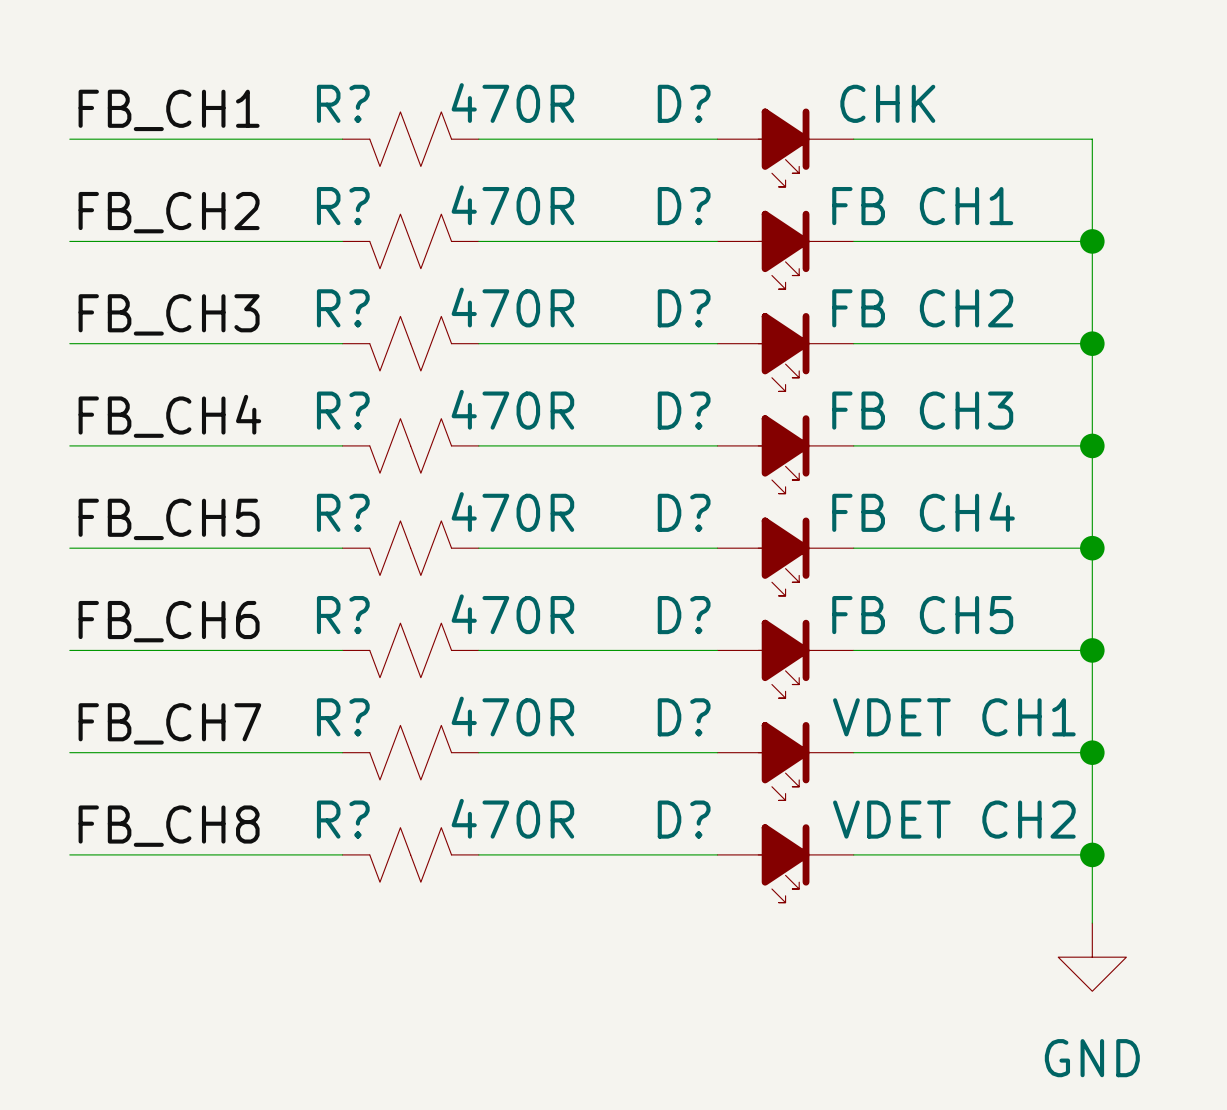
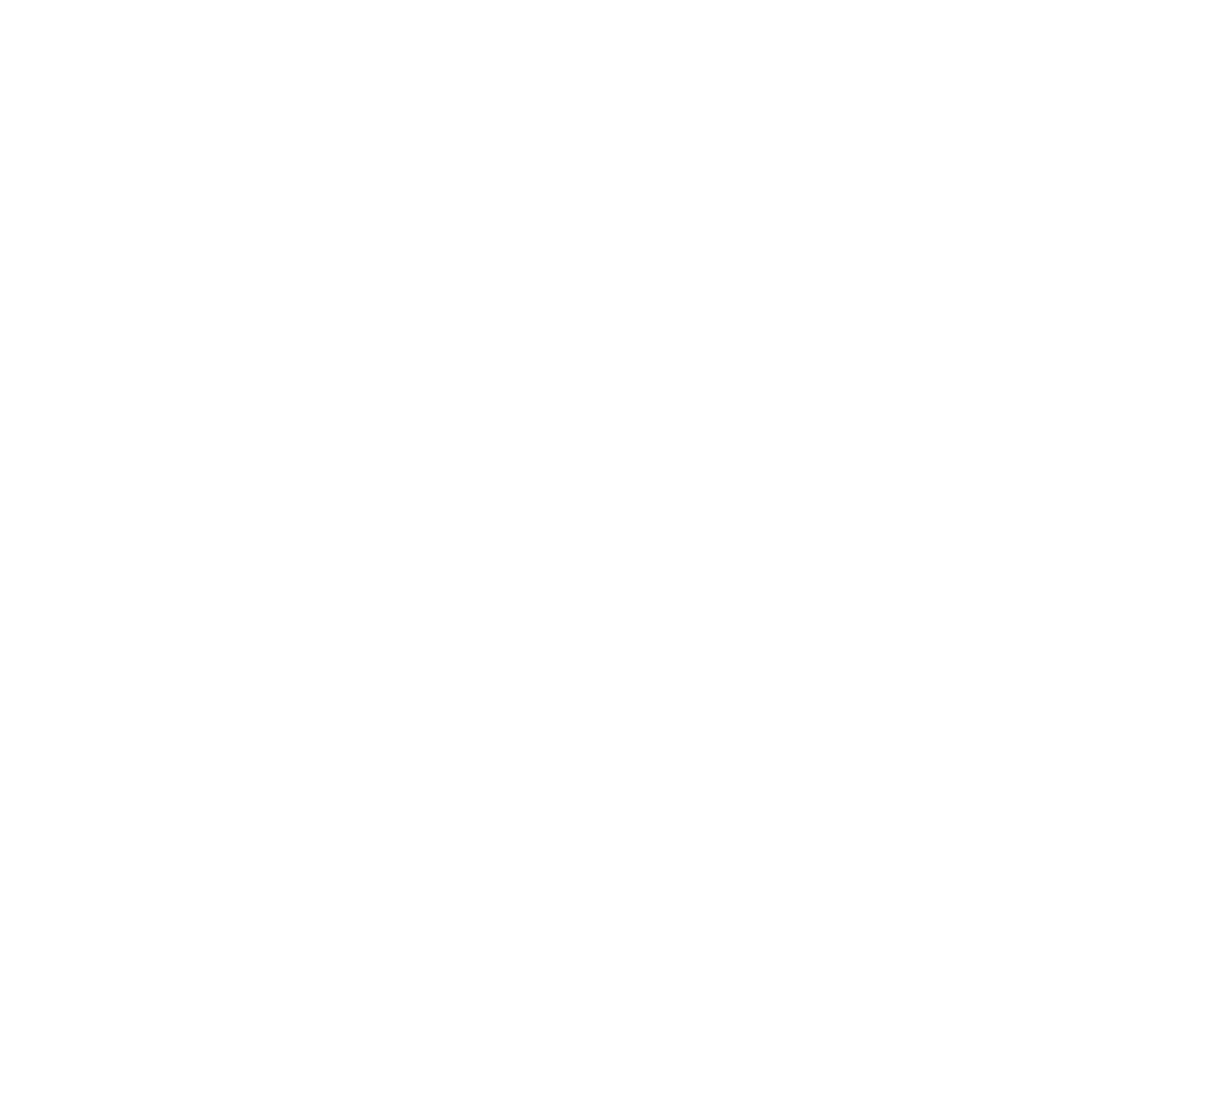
label: FB_CH1 (169, 110) -> none
wire: (69, 139) (342, 139) -> none
R?: 470R (410, 139) -> none
wire: (478, 139) (717, 139) -> none
wire: (853, 139) (1092, 139) (1092, 923) -> none
D?: CHK (785, 147) -> none
label: FB_CH2 (169, 212) -> none
wire: (69, 241) (342, 241) -> none
R?: 470R (410, 241) -> none
wire: (478, 241) (717, 241) -> none
wire: (853, 241) (1092, 241) -> none
junction: (1092, 241) -> none
D?: FB CH1 (785, 249) -> none
label: FB_CH3 (169, 314) -> none
wire: (69, 343) (342, 343) -> none
R?: 470R (410, 343) -> none
wire: (478, 343) (717, 343) -> none
wire: (853, 343) (1092, 343) -> none
junction: (1092, 343) -> none
D?: FB CH2 (785, 352) -> none
label: FB_CH4 (169, 416) -> none
wire: (69, 445) (342, 445) -> none
R?: 470R (410, 445) -> none
wire: (478, 445) (717, 445) -> none
wire: (853, 445) (1092, 445) -> none
junction: (1092, 445) -> none
D?: FB CH3 (785, 454) -> none
label: FB_CH5 (169, 519) -> none
wire: (69, 548) (342, 548) -> none
R?: 470R (410, 548) -> none
wire: (478, 548) (717, 548) -> none
wire: (853, 548) (1092, 548) -> none
junction: (1092, 548) -> none
D?: FB CH4 (785, 556) -> none
label: FB_CH6 (169, 621) -> none
wire: (69, 650) (342, 650) -> none
R?: 470R (410, 650) -> none
wire: (478, 650) (717, 650) -> none
wire: (853, 650) (1092, 650) -> none
junction: (1092, 650) -> none
D?: FB CH5 (785, 658) -> none
label: FB_CH7 (169, 723) -> none
wire: (69, 752) (342, 752) -> none
R?: 470R (410, 752) -> none
wire: (478, 752) (717, 752) -> none
wire: (853, 752) (1092, 752) -> none
junction: (1092, 752) -> none
D?: VDET CH1 (785, 761) -> none
label: FB_CH8 (169, 826) -> none
wire: (69, 854) (342, 854) -> none
R?: 470R (410, 854) -> none
wire: (478, 854) (717, 854) -> none
wire: (853, 854) (1092, 854) -> none
junction: (1092, 854) -> none
D?: VDET CH2 (785, 863) -> none
power symbol: GND (1092, 957) -> none

